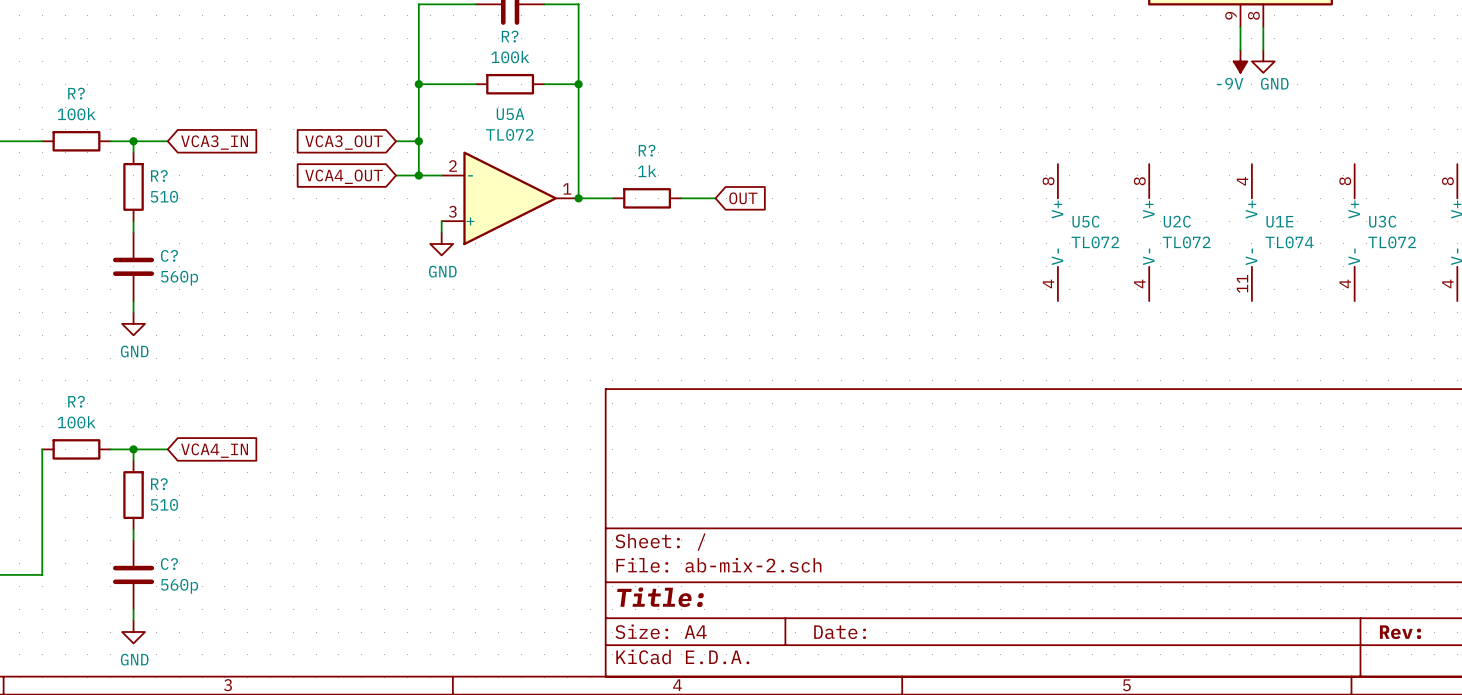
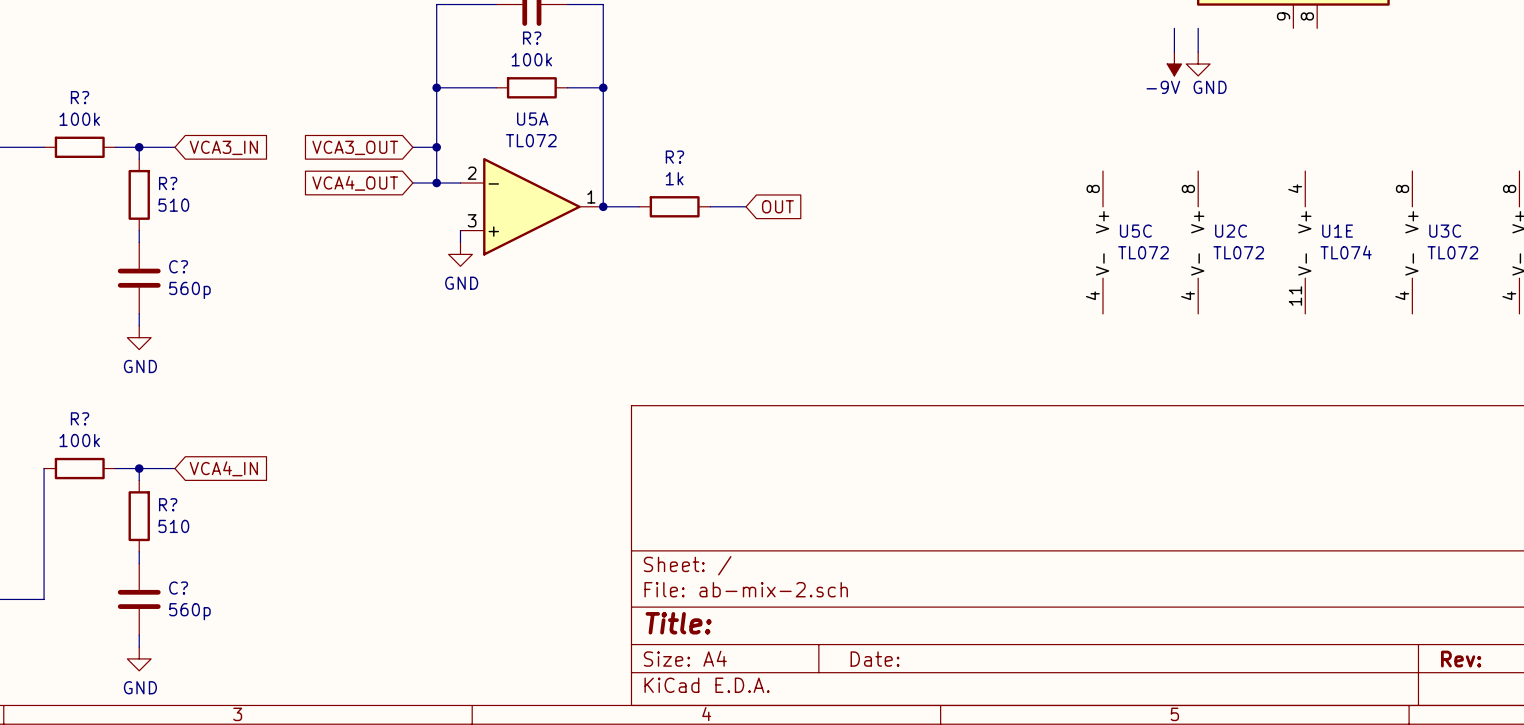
wire: (1240, 27) (1240, 49) -> (1174, 28) (1174, 52)
wire: (1263, 27) (1263, 49) -> (1198, 28) (1198, 52)
power symbol position: -9V (1240, 61) -> -9V (1174, 64)
power symbol position: GND (1263, 61) -> GND (1198, 64)

